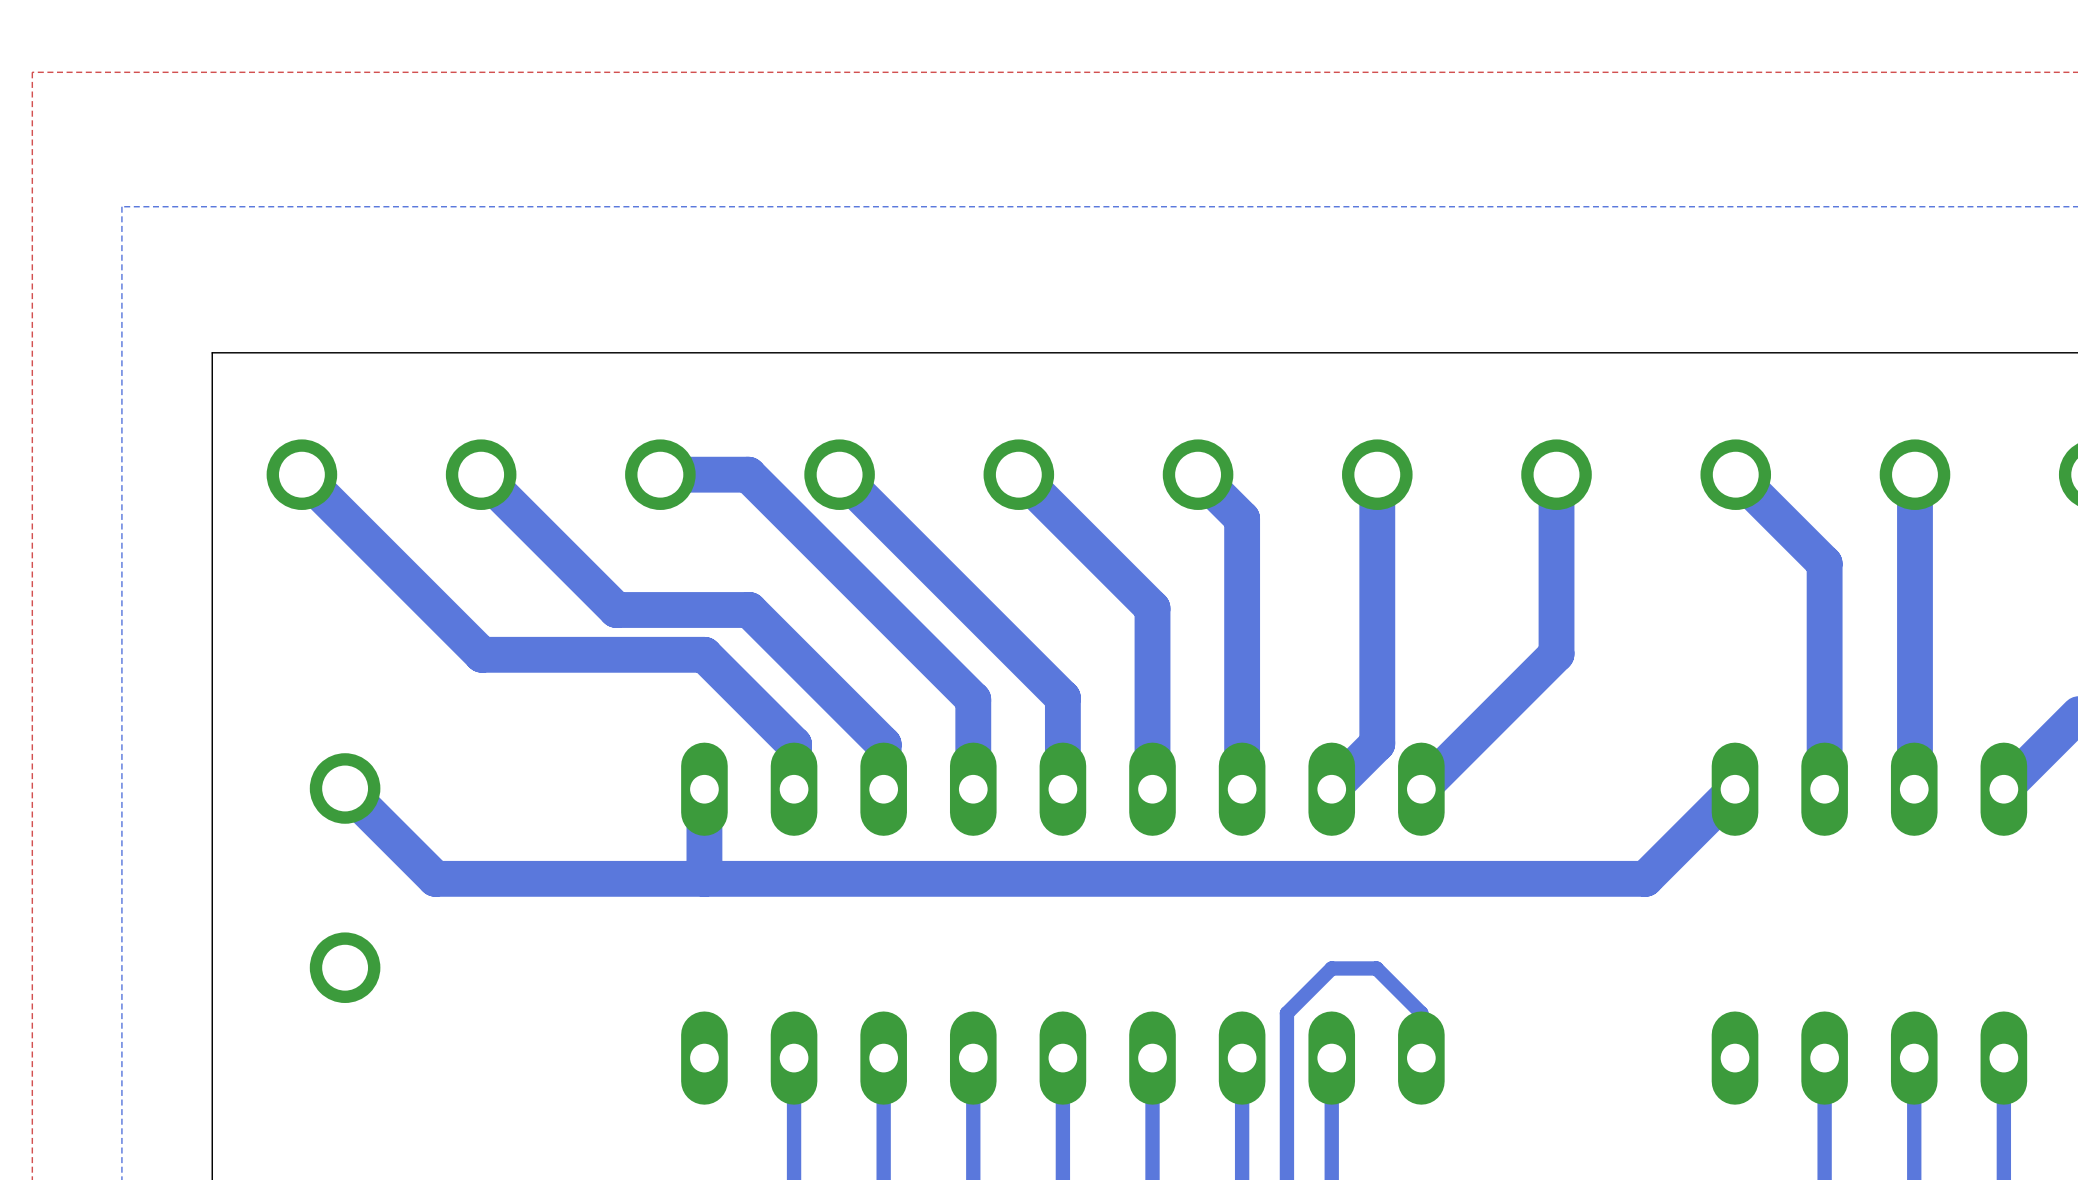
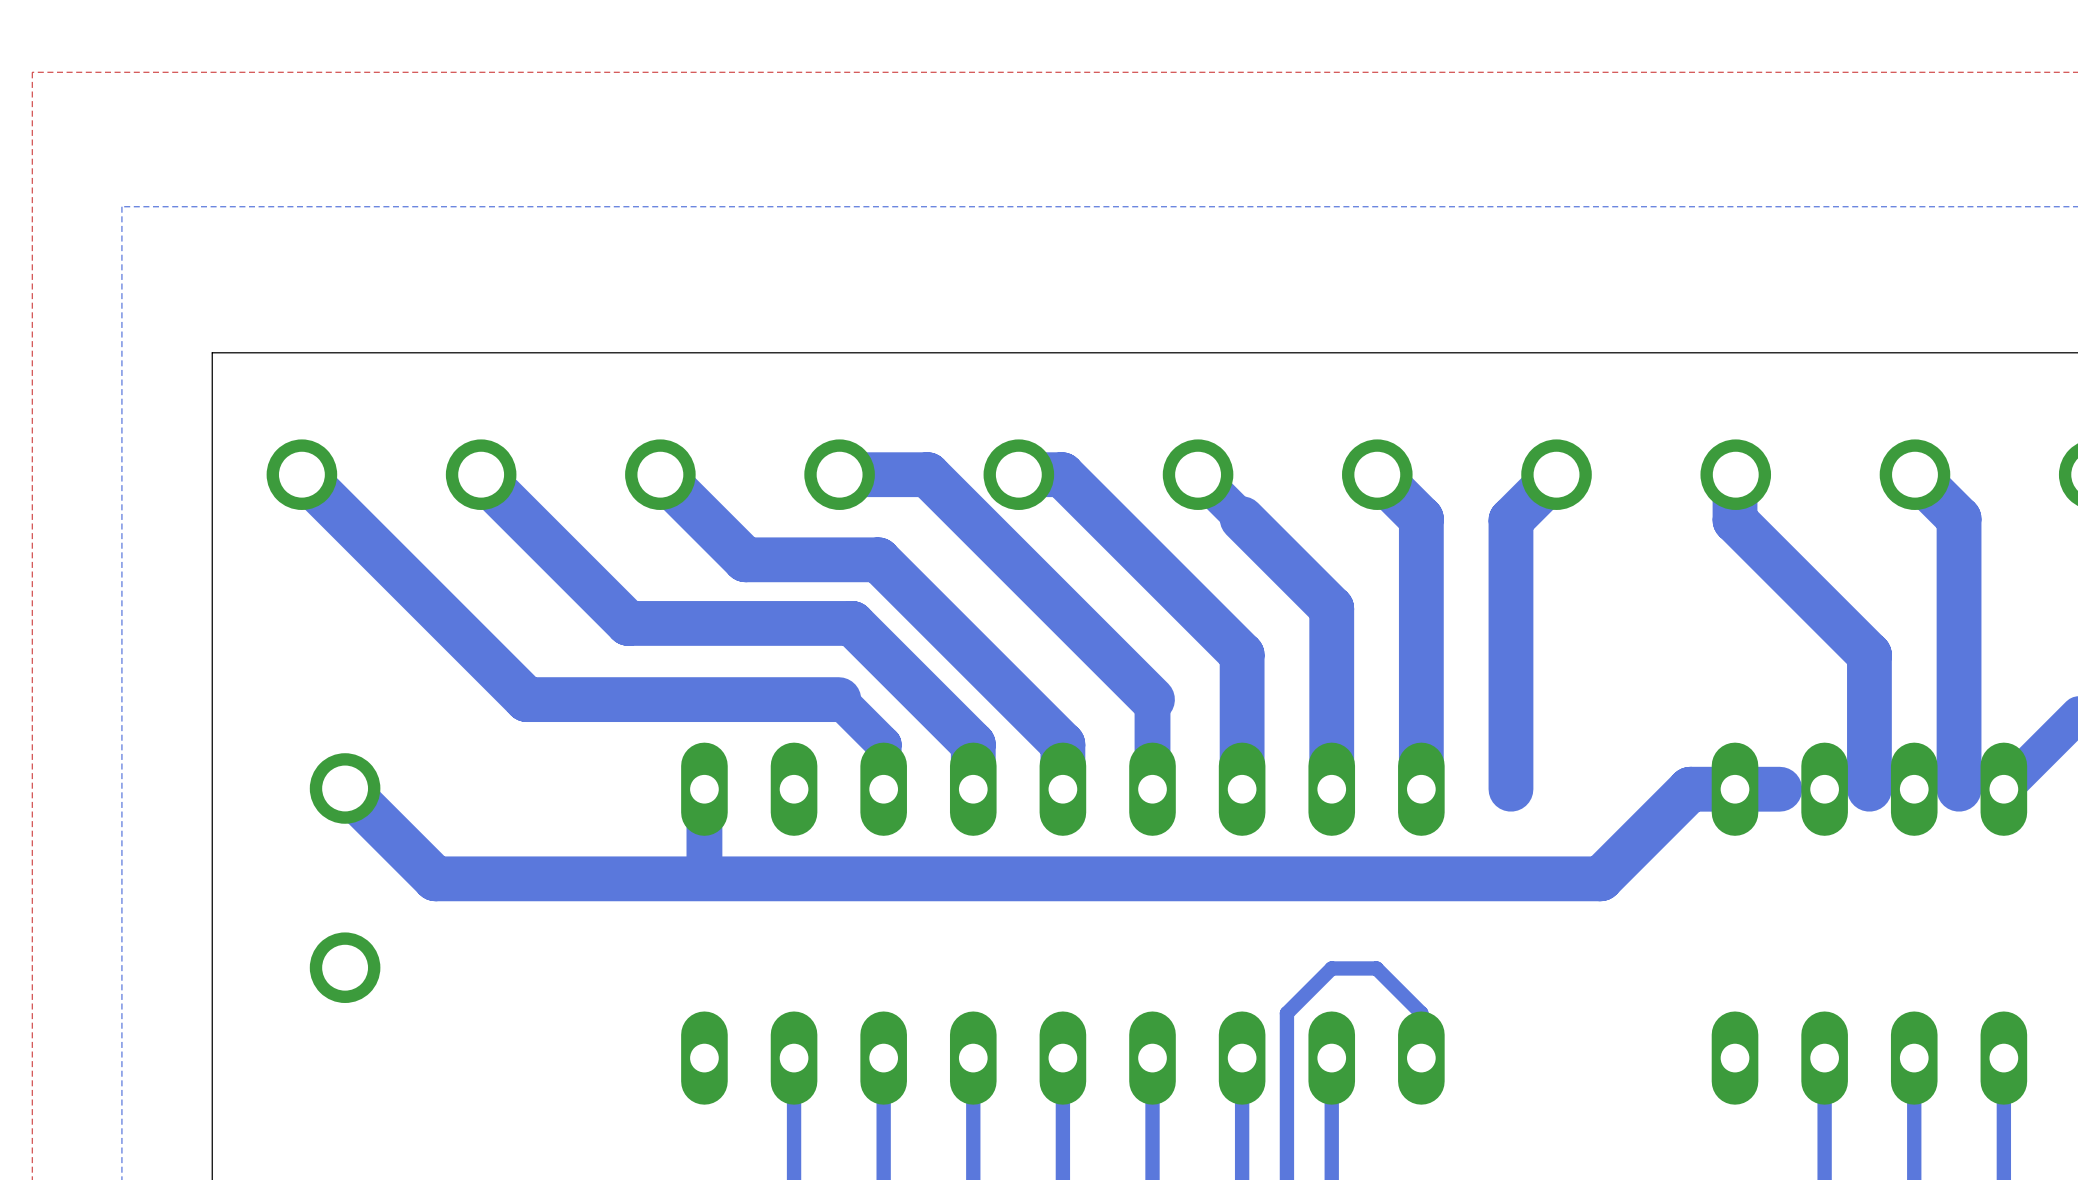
bottom track width: thin (301, 474) (482, 654) -> thick (301, 474) (482, 654)
bottom track: (481, 474) (616, 610) (749, 610) (838, 699) -> (481, 474) (628, 623) (852, 623) (973, 744)
bottom track: (660, 474) (748, 474) (973, 699) (973, 744) -> (660, 474) (745, 559) (878, 559) (1062, 744)
bottom track: (839, 474) (1062, 697) (1062, 744) -> (839, 474) (927, 474) (1152, 699)
bottom track: (1018, 474) (1152, 608) (1152, 699) -> (1018, 474) (1062, 474) (1242, 654)
bottom track: (1377, 474) (1377, 743) (1331, 789) -> (1377, 474) (1421, 518) (1421, 789)
bottom track: (1556, 474) (1556, 654) (1421, 789) -> (1556, 474) (1510, 520) (1510, 789)
bottom track: (1735, 474) (1824, 563) (1824, 789) -> (1735, 474) (1735, 520) (1869, 654) (1869, 789)
bottom track: (1914, 474) (1914, 789) -> (1914, 474) (1959, 518) (1959, 789)
bottom track: (1242, 518) (1242, 654) -> (1242, 518) (1331, 608) (1331, 789)
bottom track: (482, 654) (704, 654) (794, 744) (794, 789) -> (482, 654) (526, 699) (838, 699)
bottom track width: thin (1242, 654) (1242, 789) -> thick (1242, 654) (1242, 789)
bottom track width: thin (345, 788) (435, 878) (1600, 878) -> thick (345, 788) (435, 878) (1600, 878)
bottom track: (1735, 789) (1645, 878) (1600, 878) -> (1779, 789) (1690, 789) (1600, 878)

